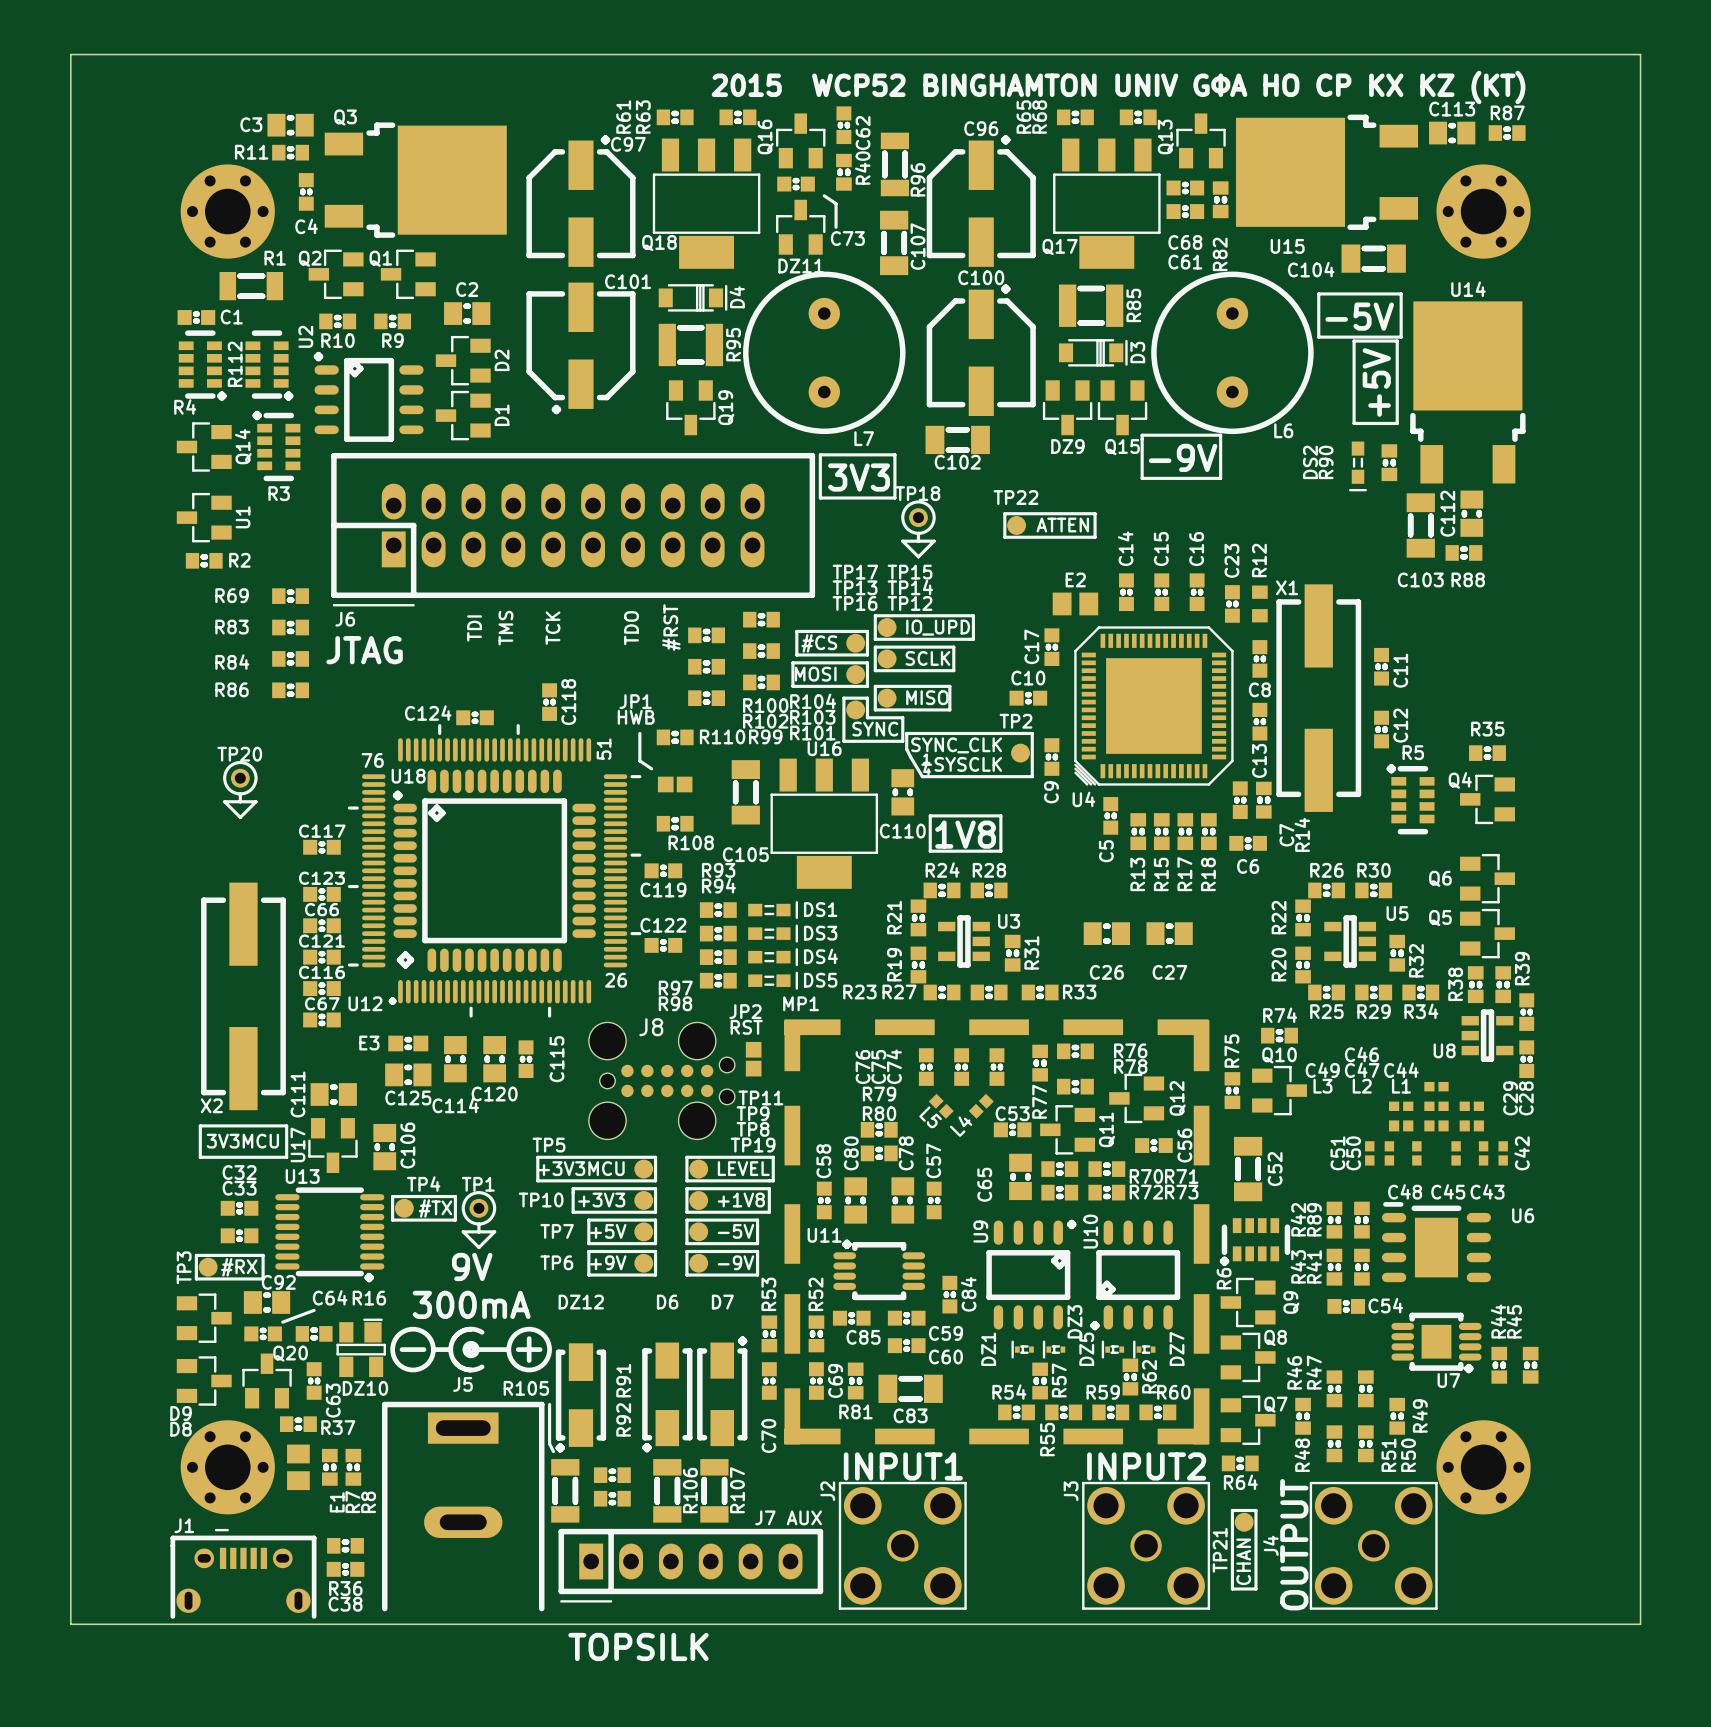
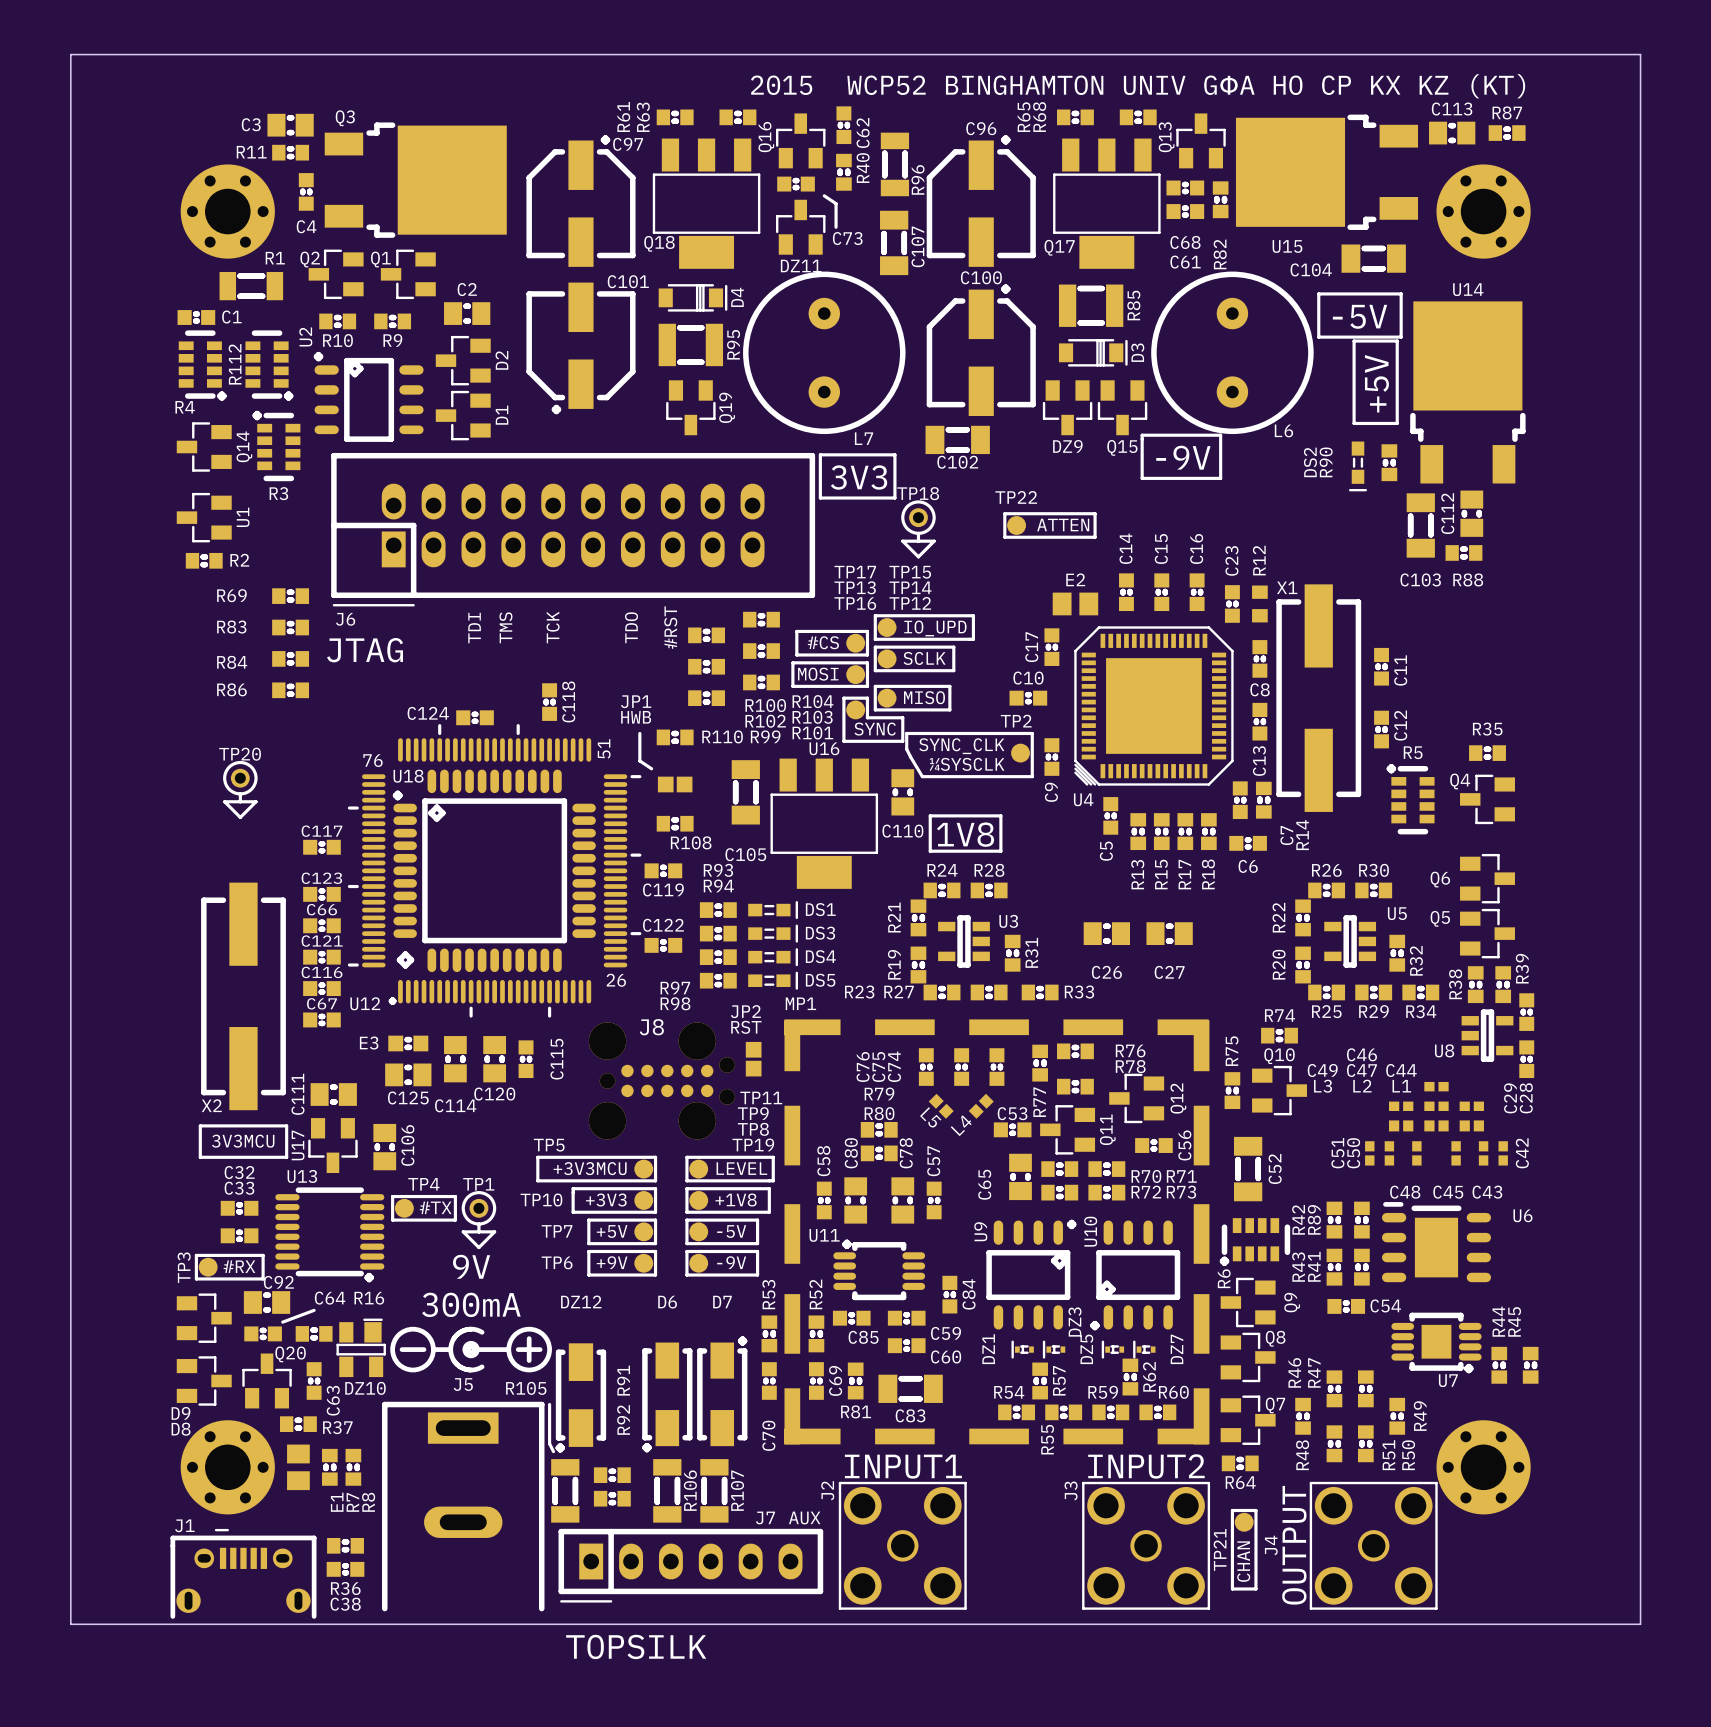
J8 footprint: [588, 1022, 735, 1140] -> [588, 1022, 735, 1140]

